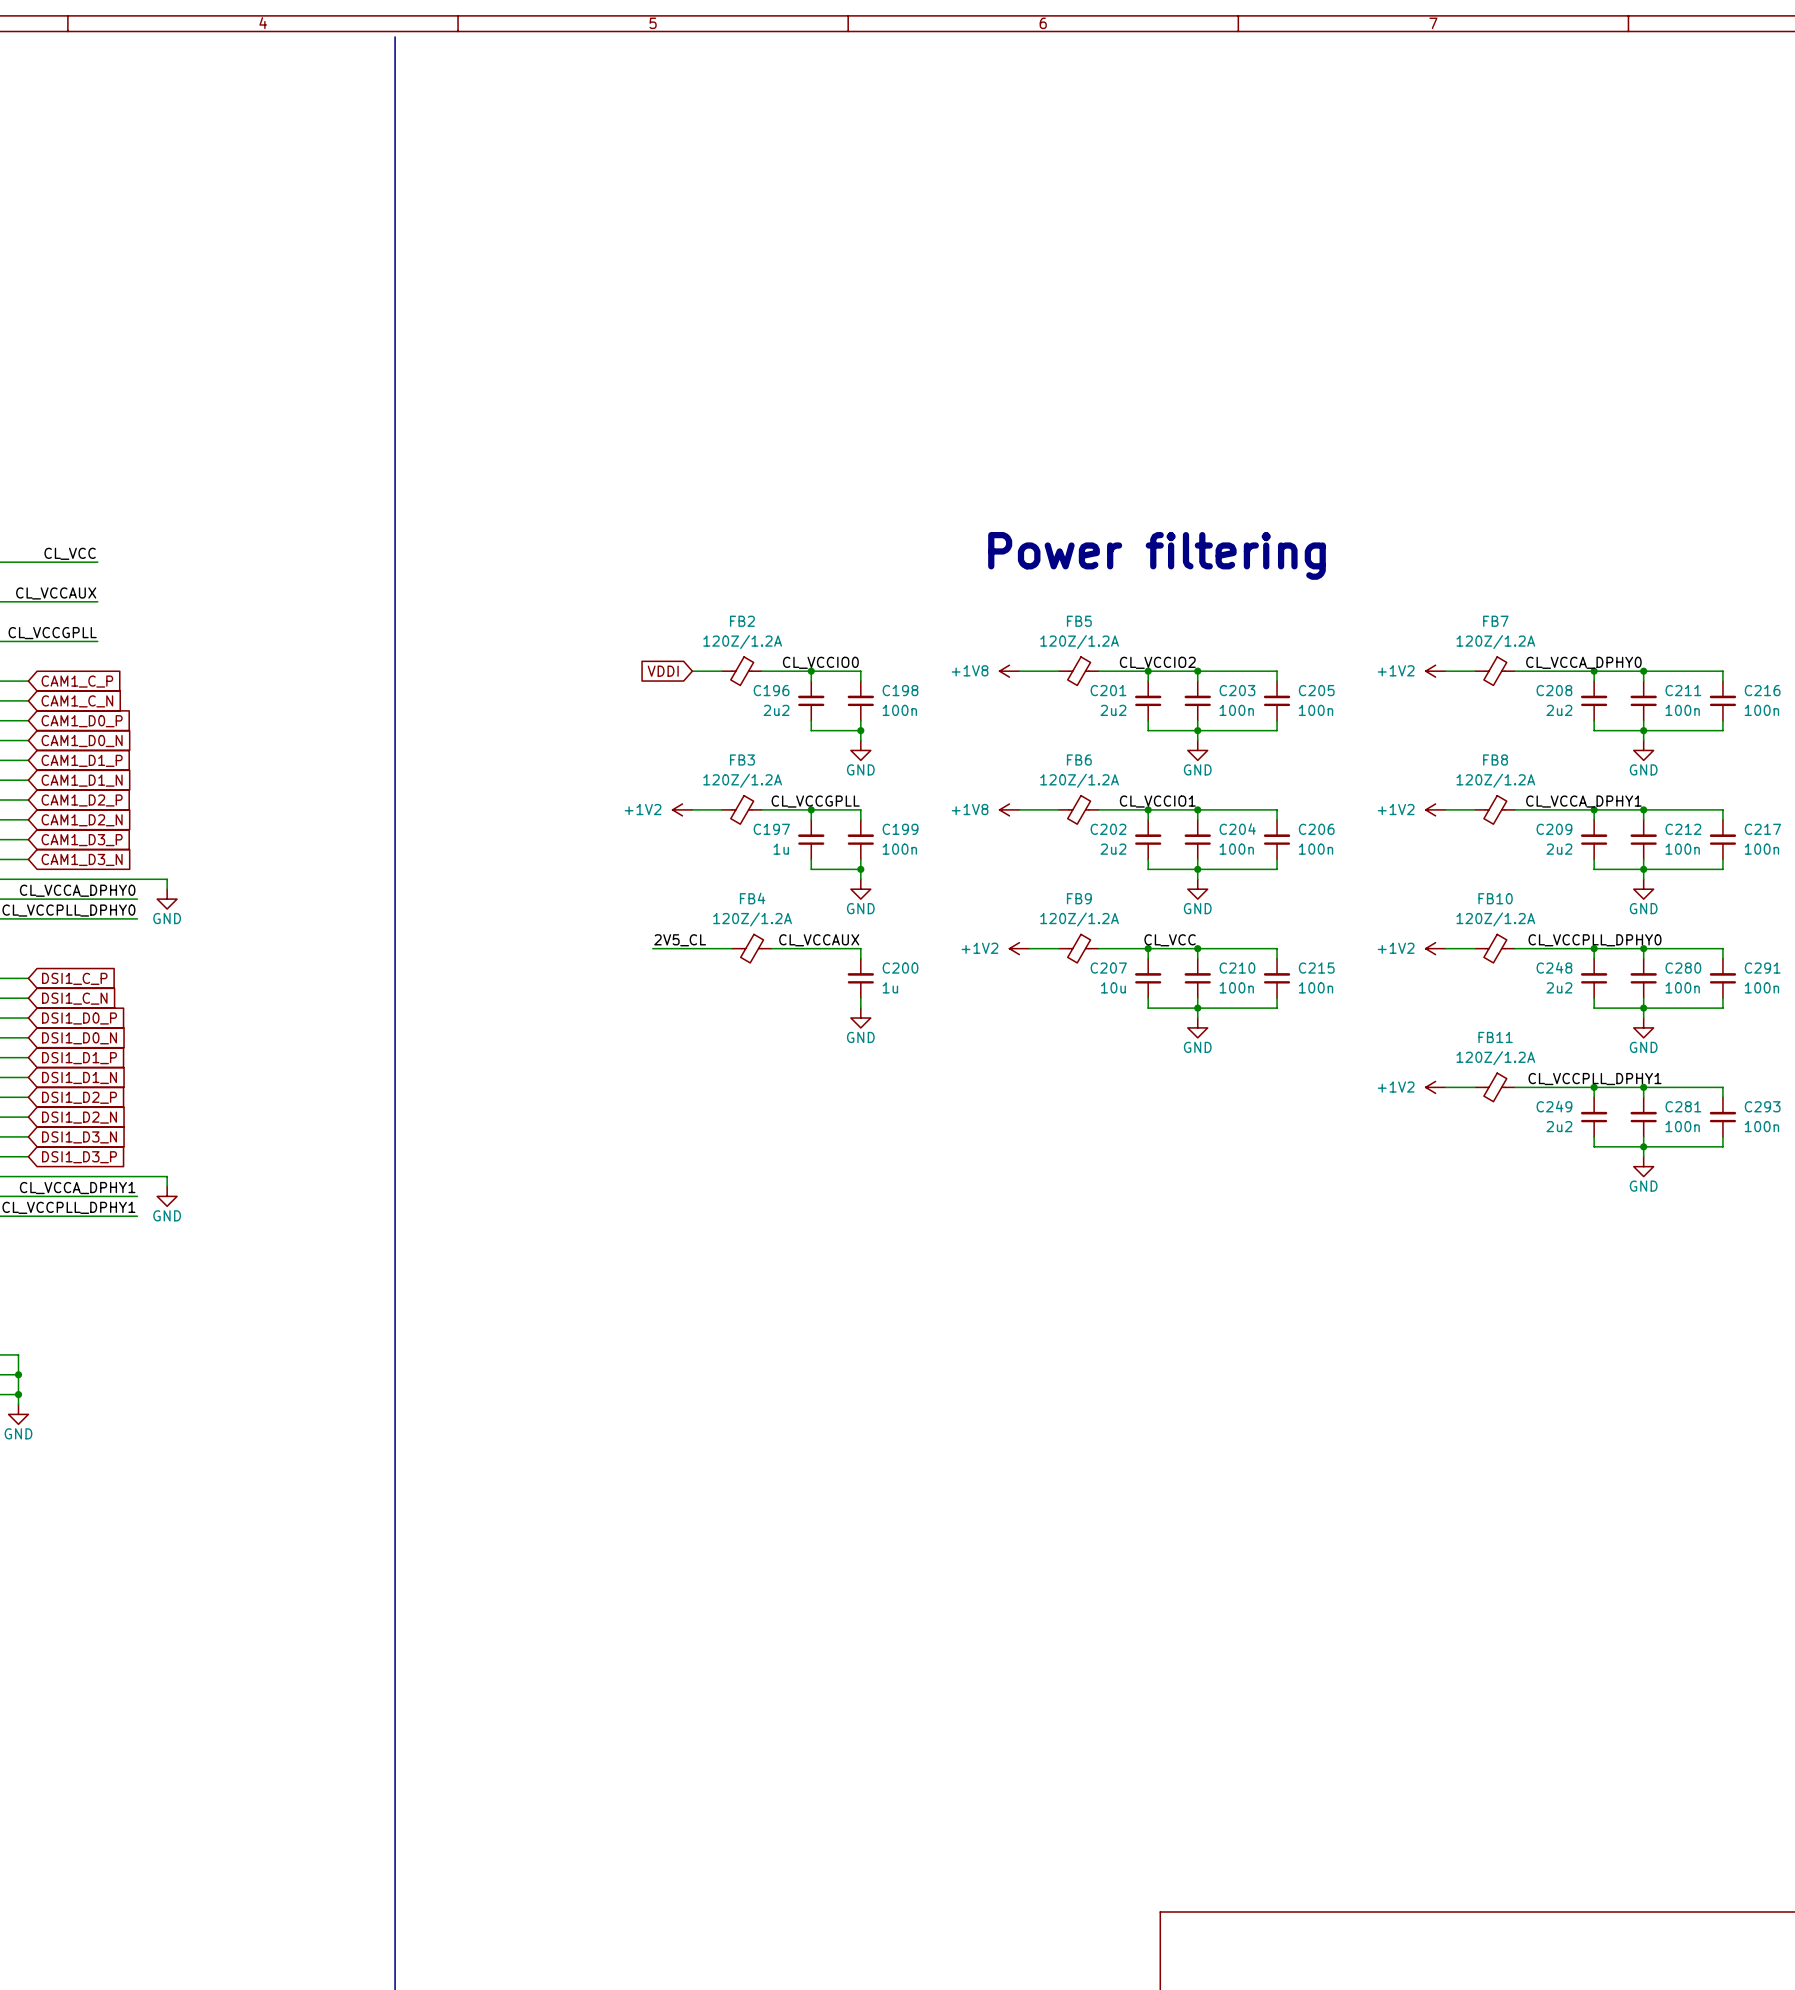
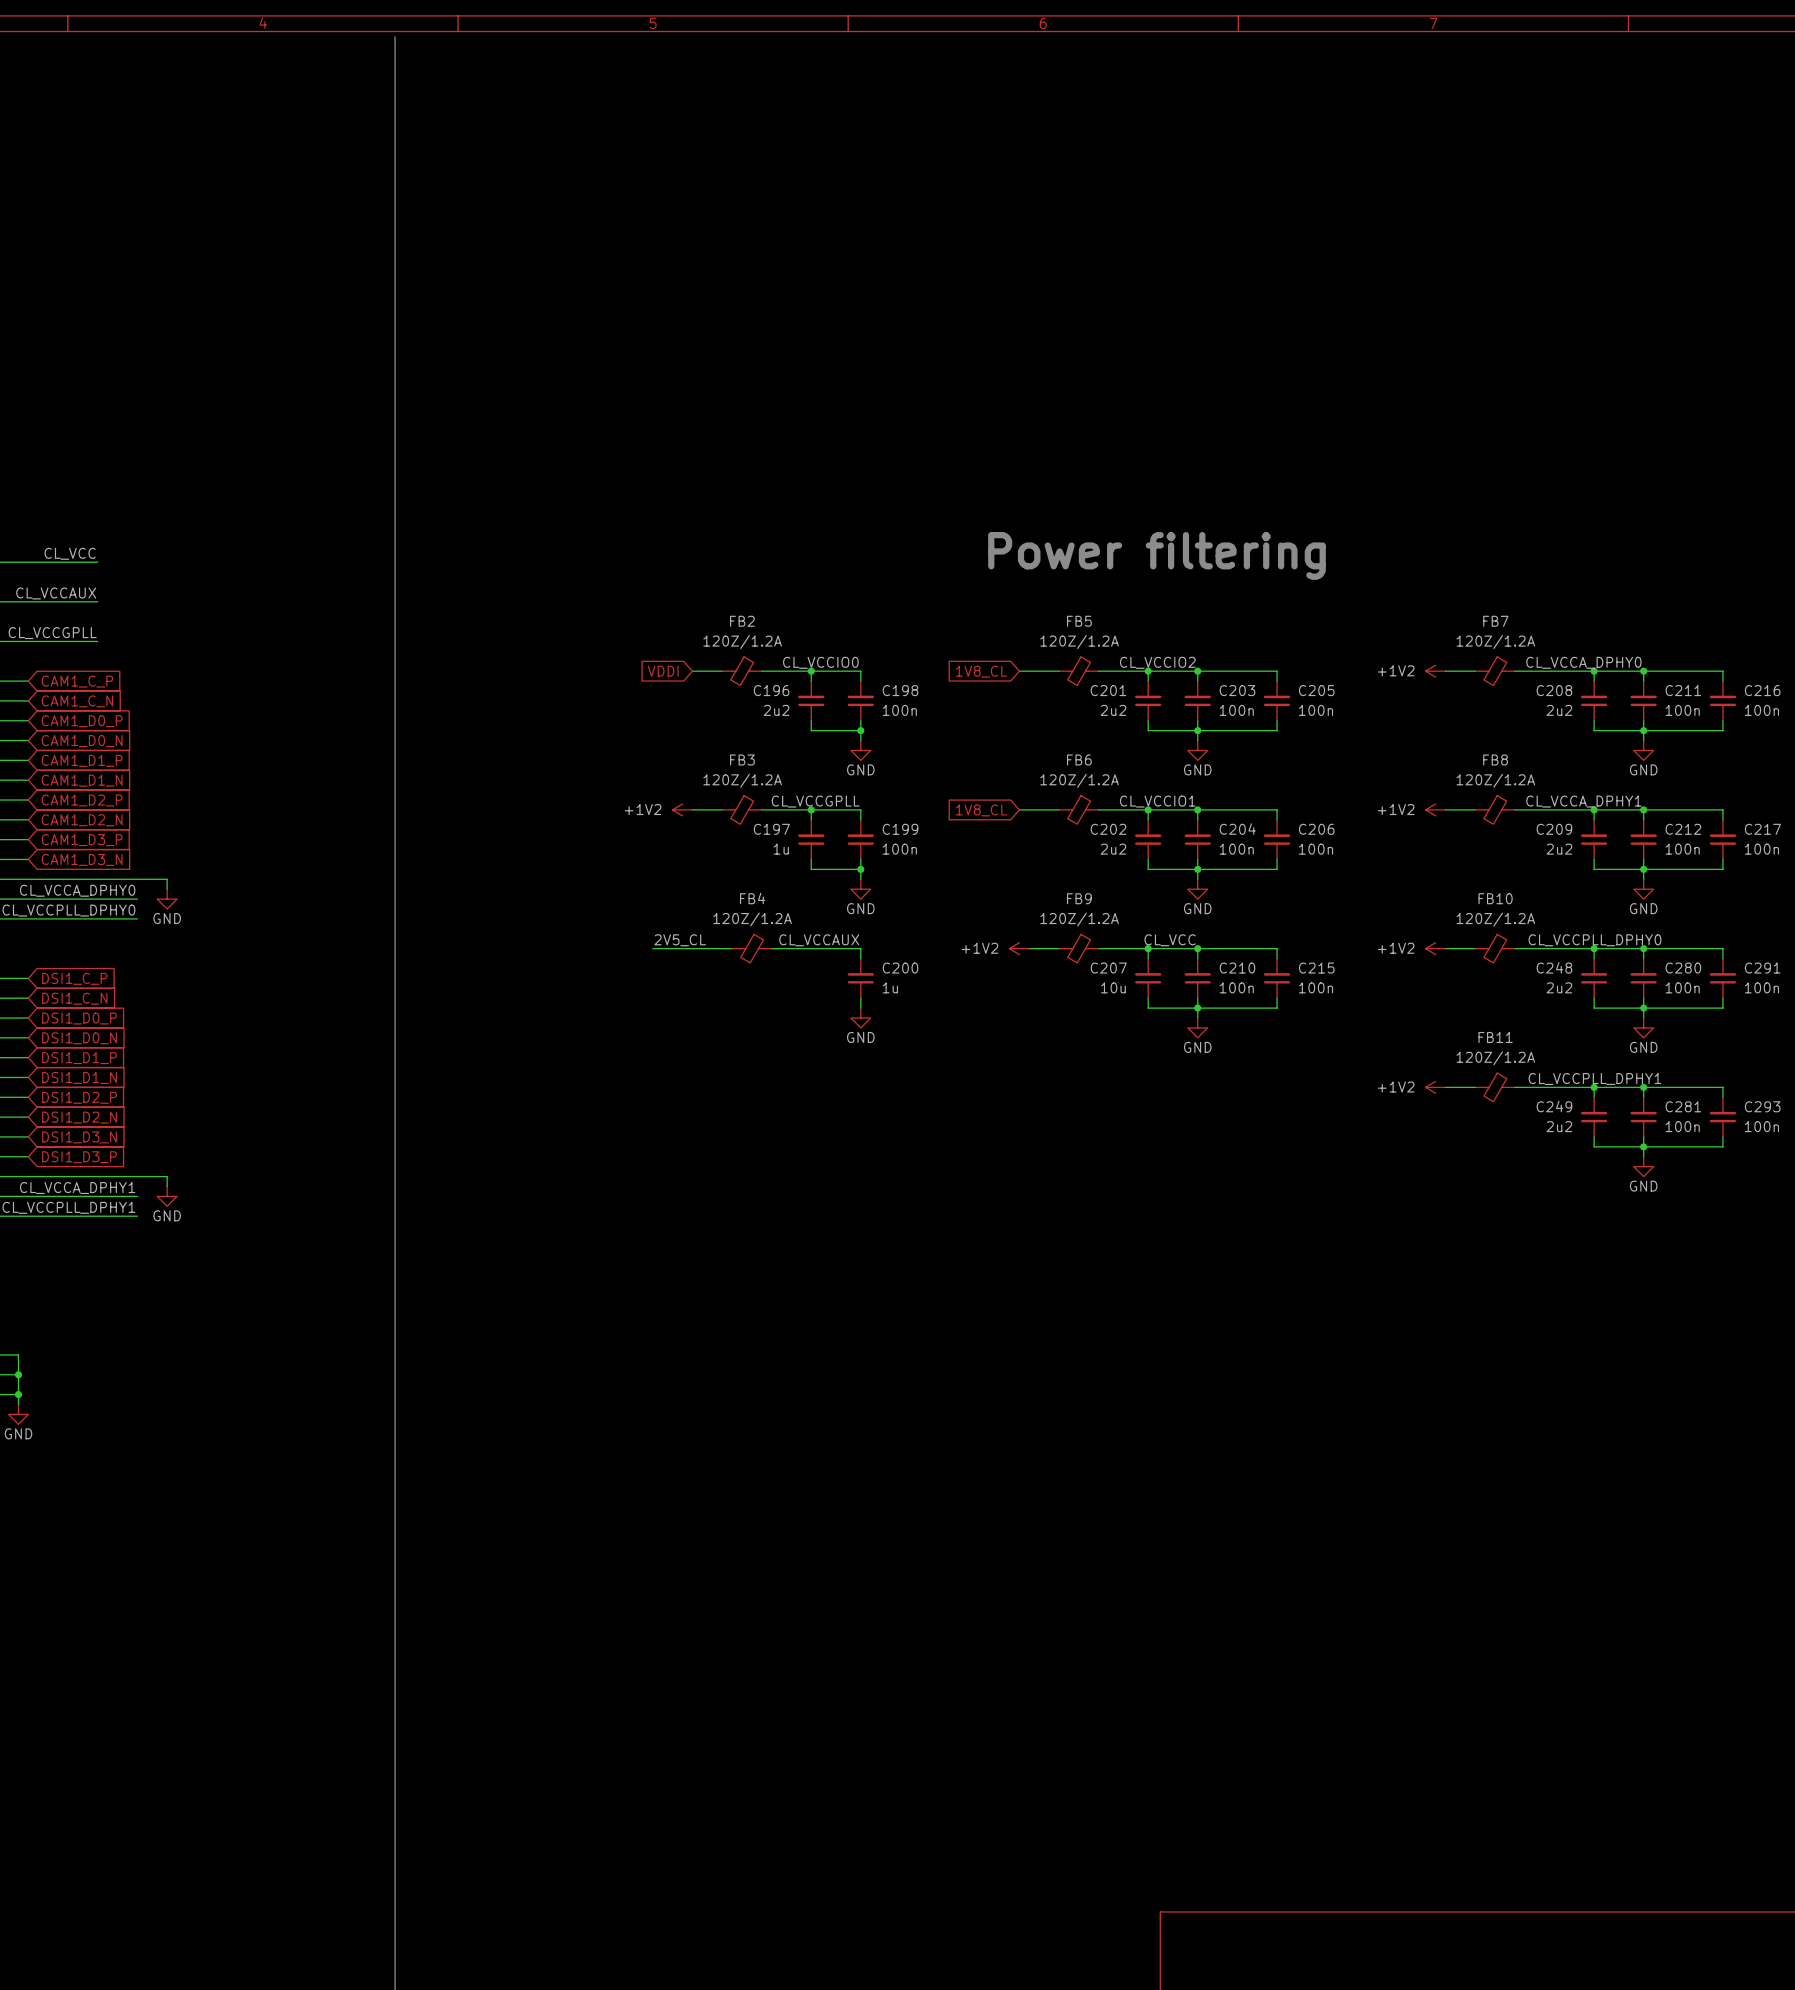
global label: none -> 1V8_CL (981, 671)
power symbol: +1V8 (1009, 671) -> none
power symbol: +1V8 (1009, 809) -> none
global label: none -> 1V8_CL (981, 810)

